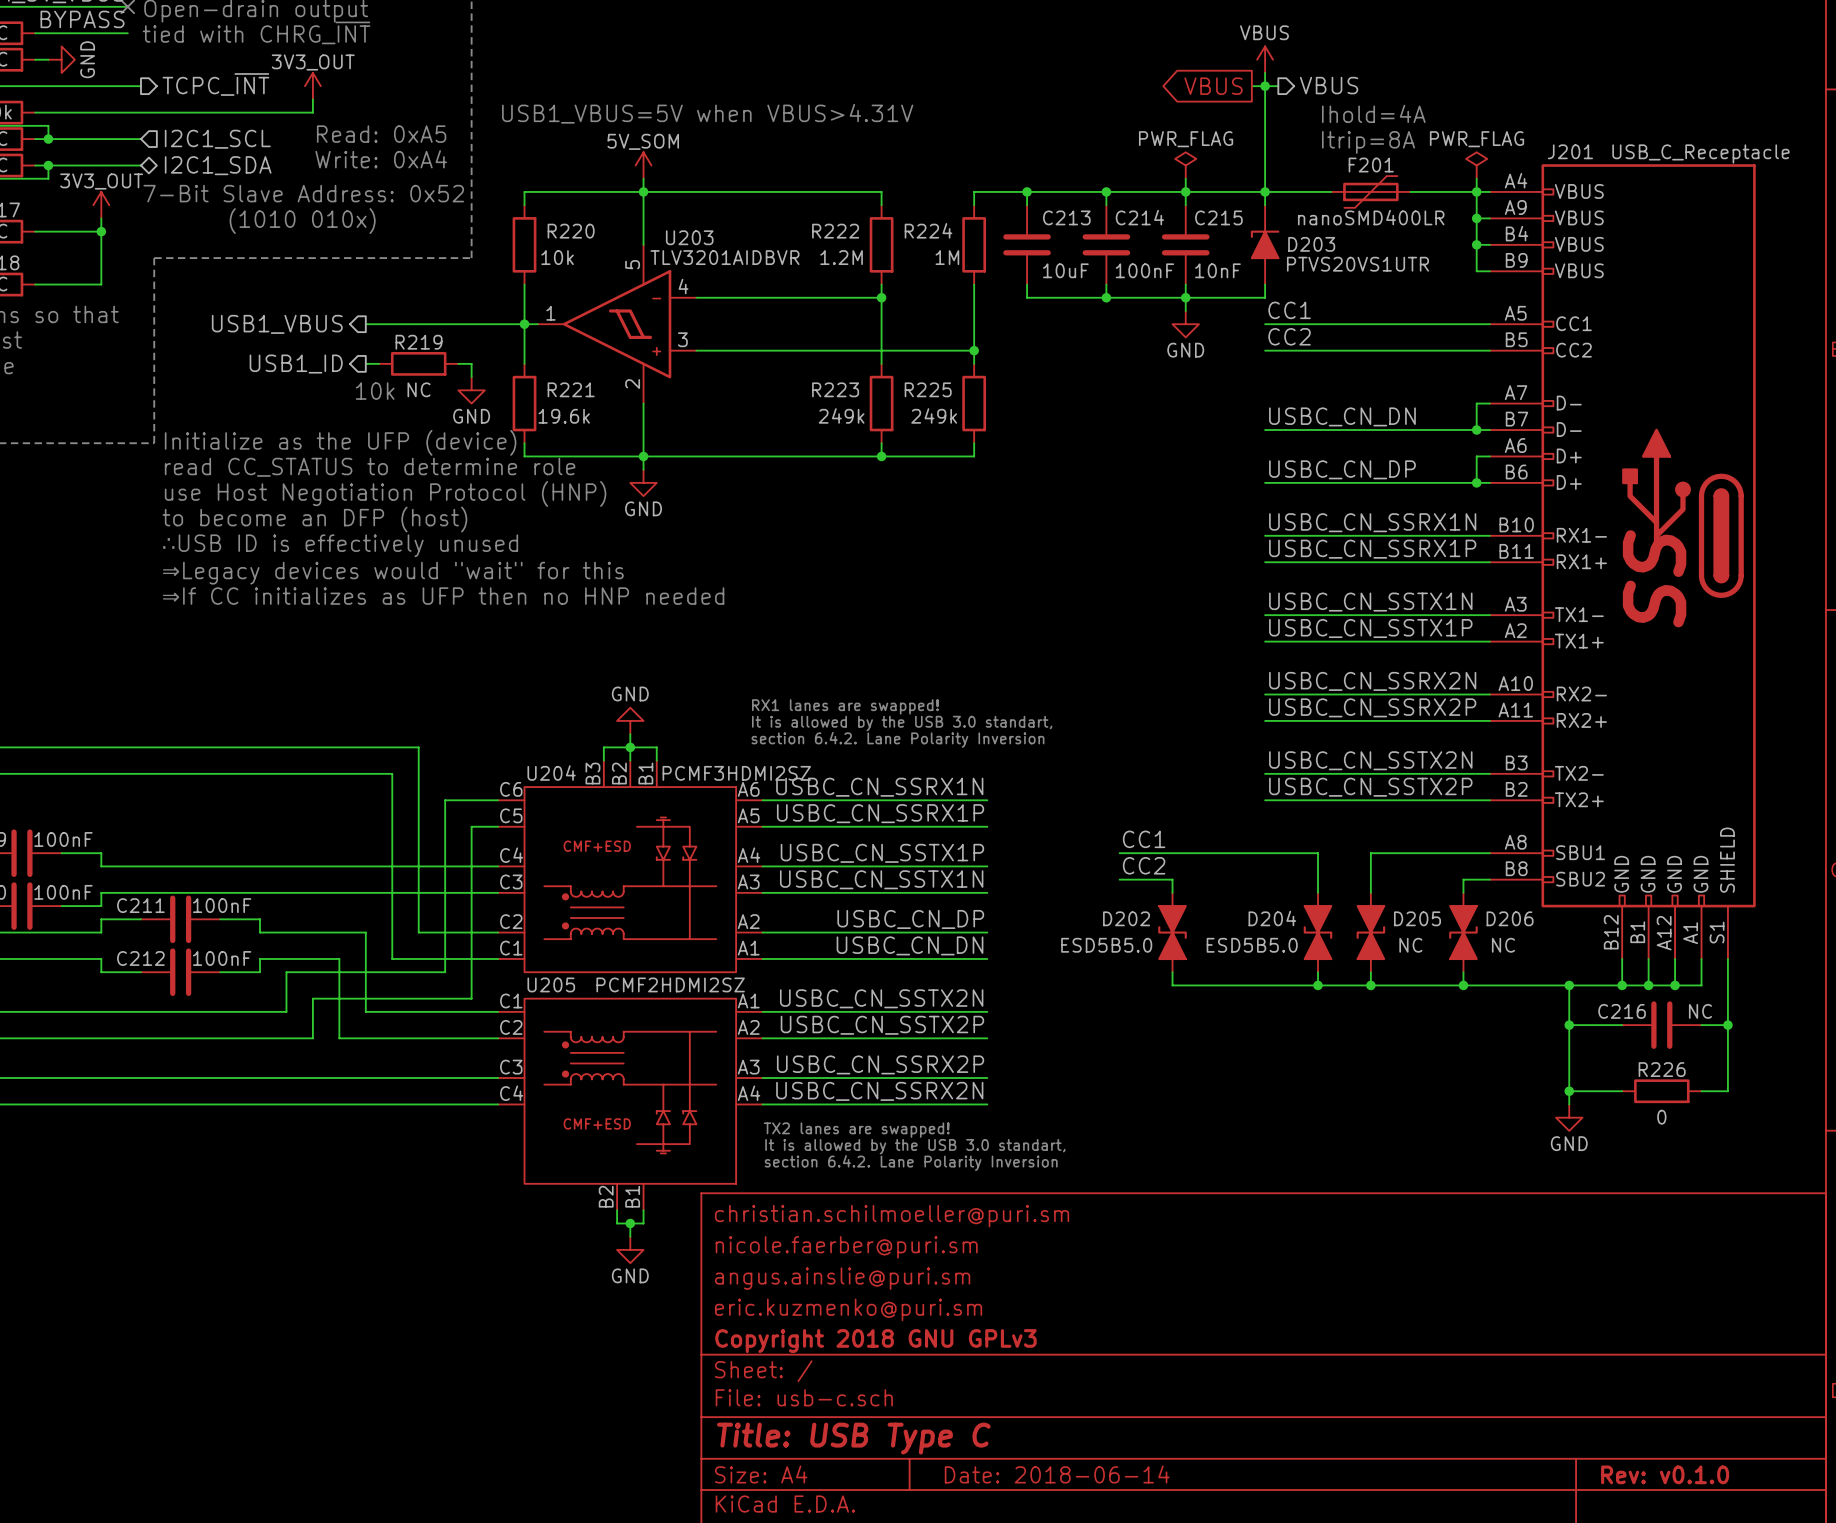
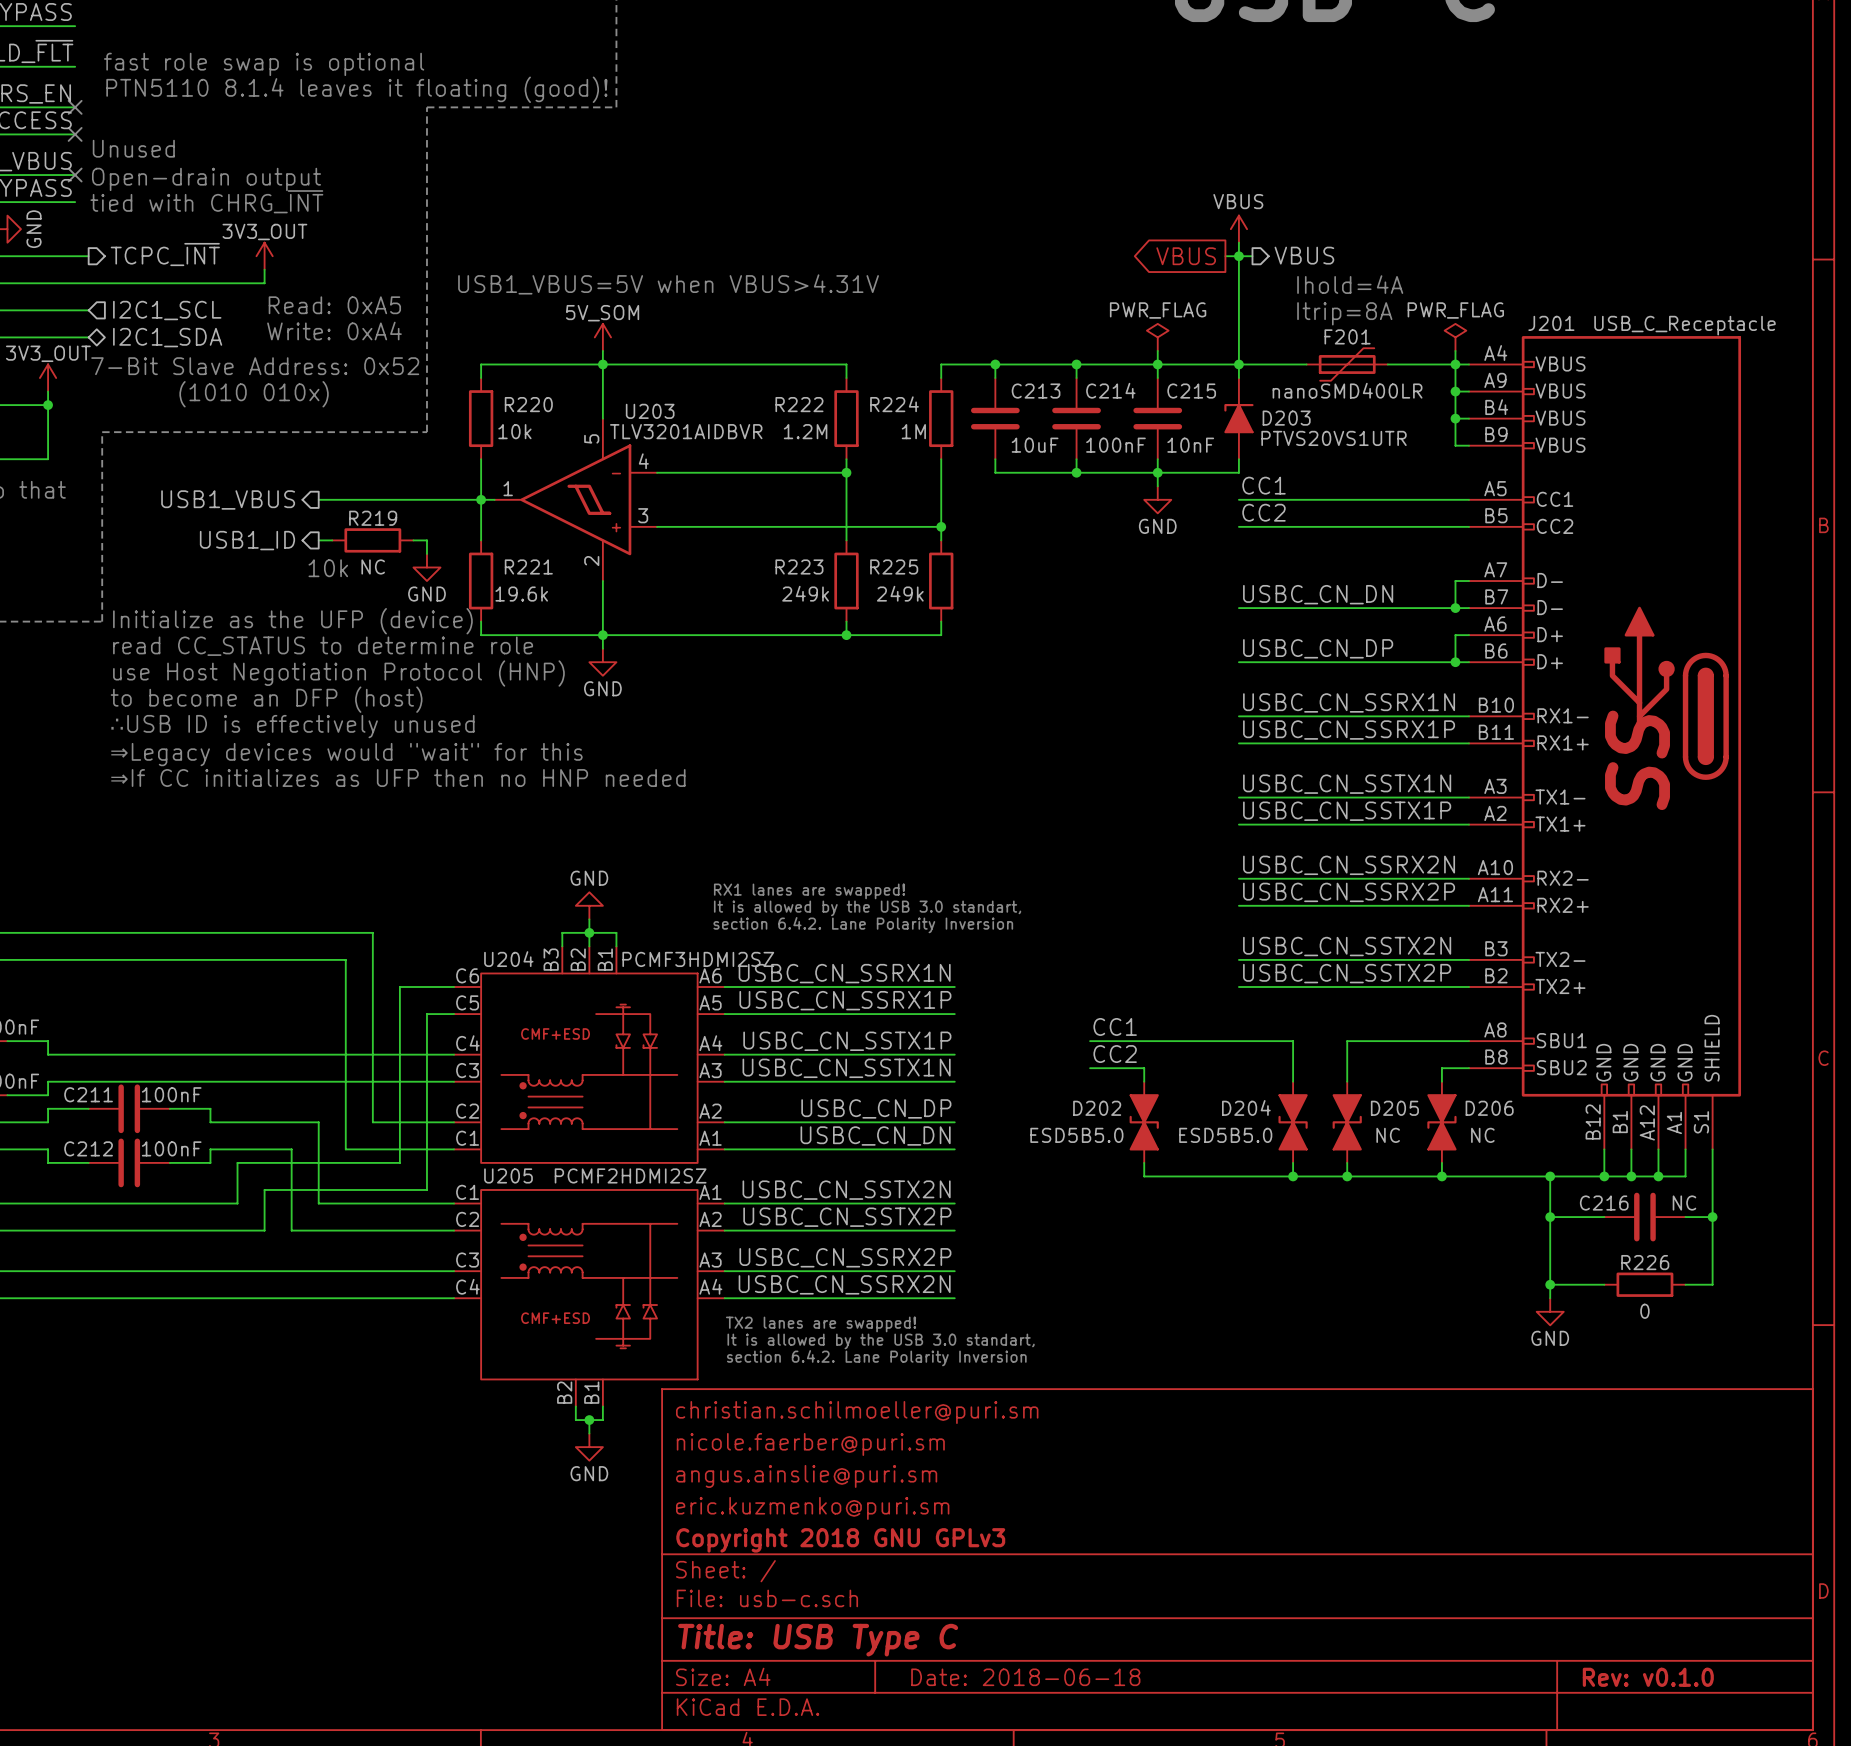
title block: Date: 2018-06-14 (1057, 1474) -> Date: 2018-06-18 (1025, 1677)

